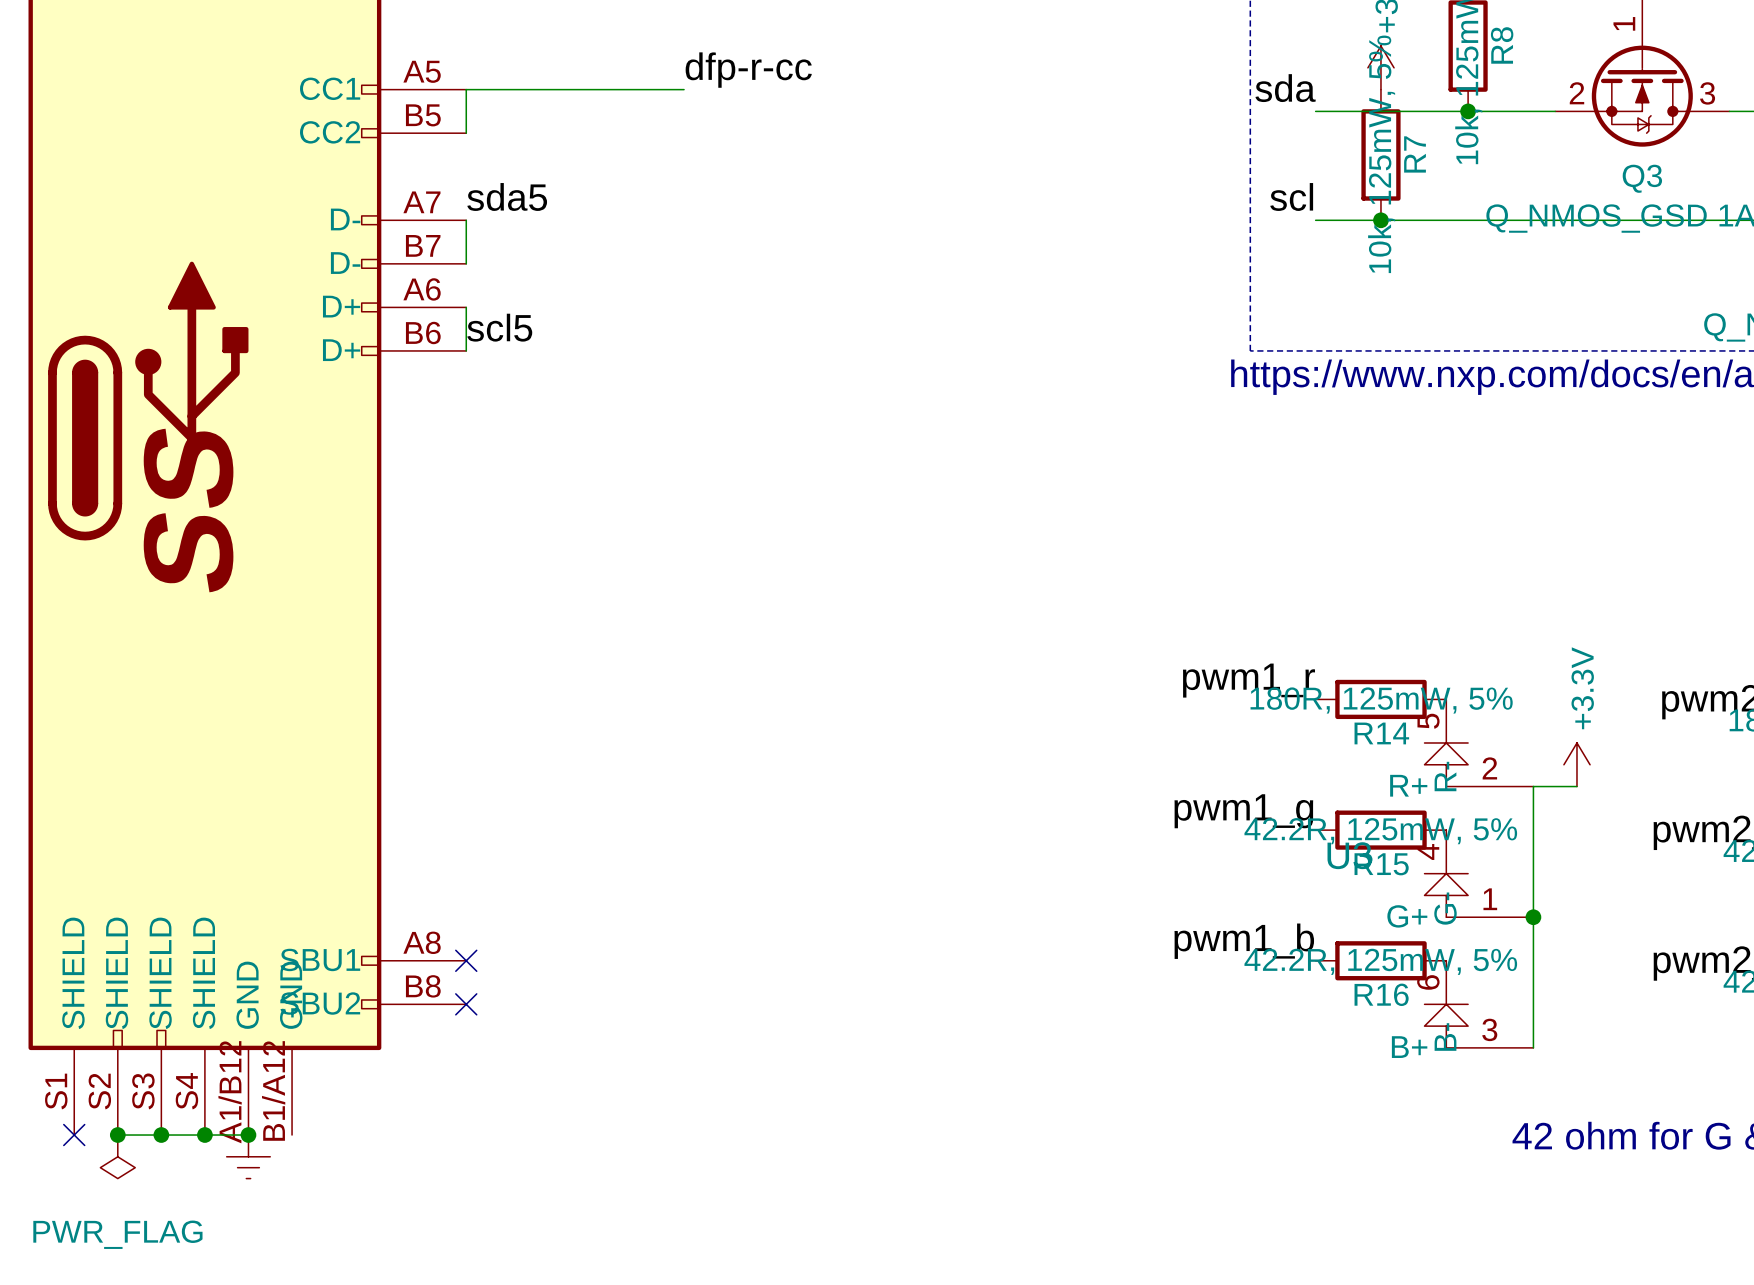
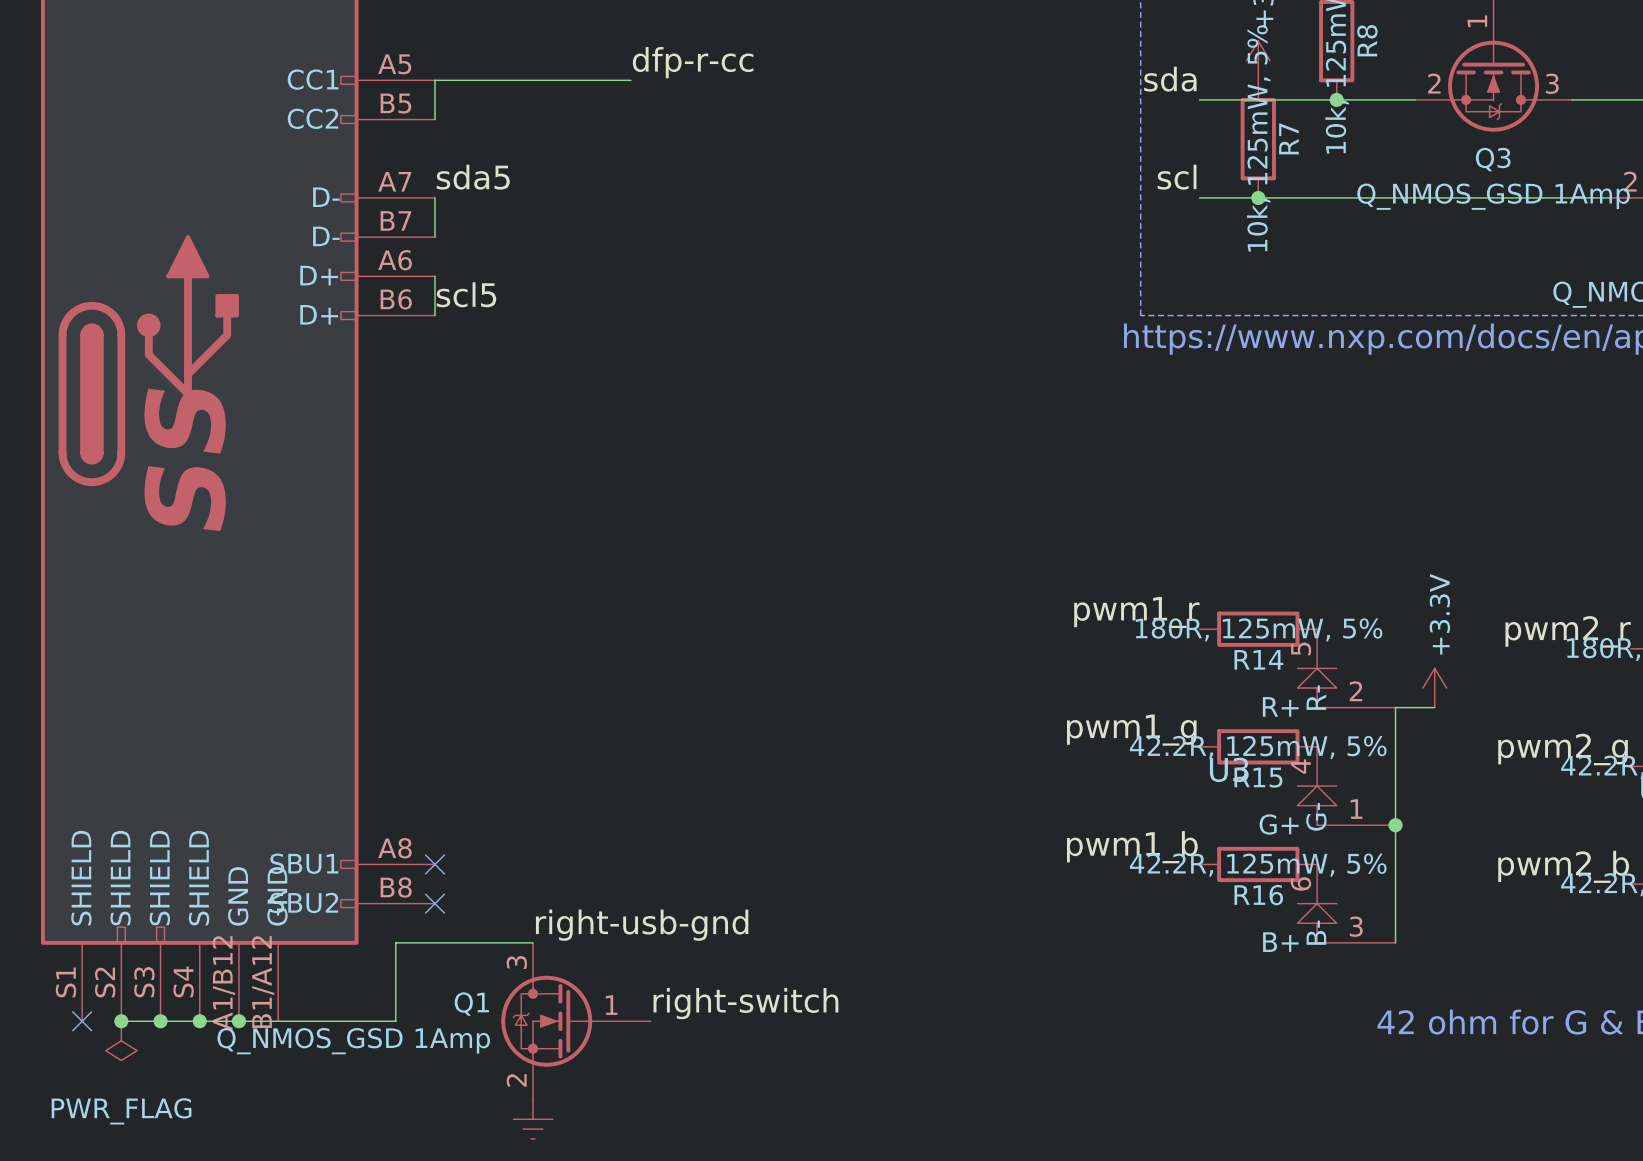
label: none -> right-usb-gnd (642, 925)
wire: none -> (533, 942) (395, 942) (395, 1021) (238, 1021)
label: none -> right-switch (745, 1003)
Q1: none -> Q_NMOS_GSD 1Amp (575, 1021)
power symbol position: (248, 1156) -> (533, 1119)

